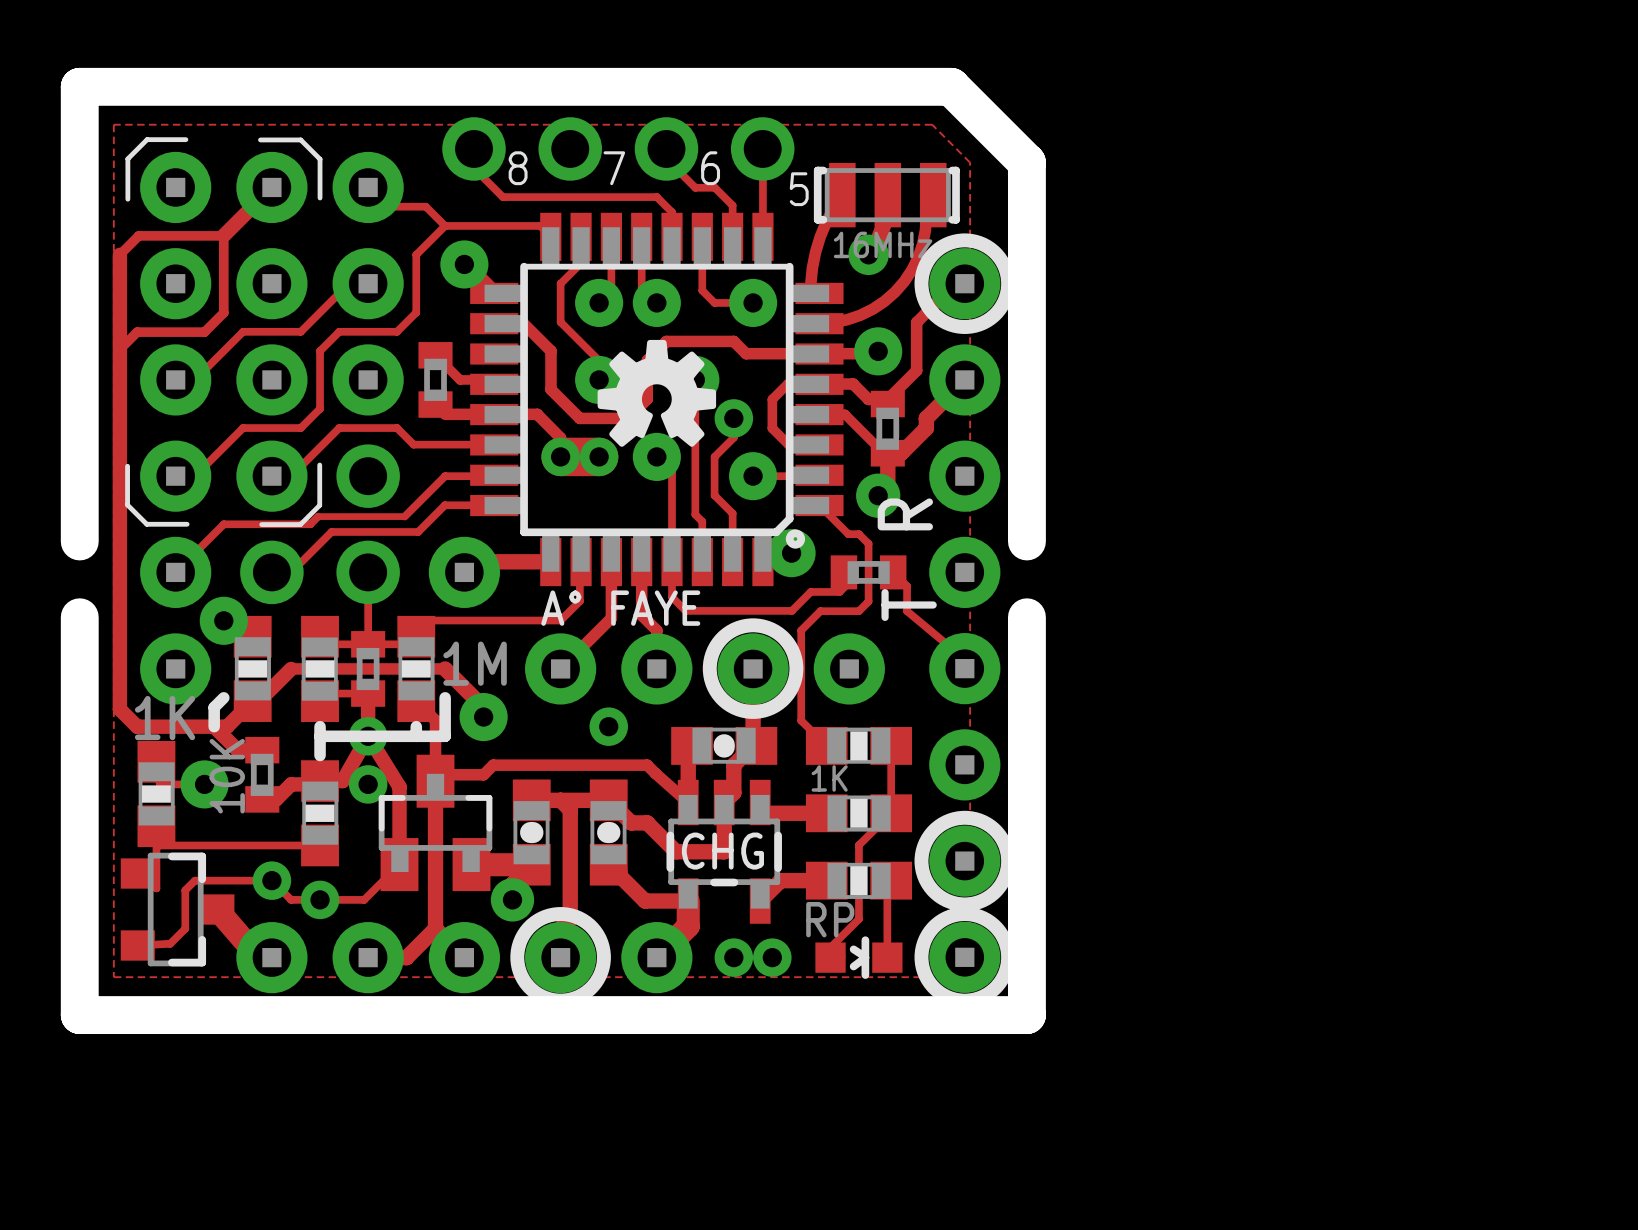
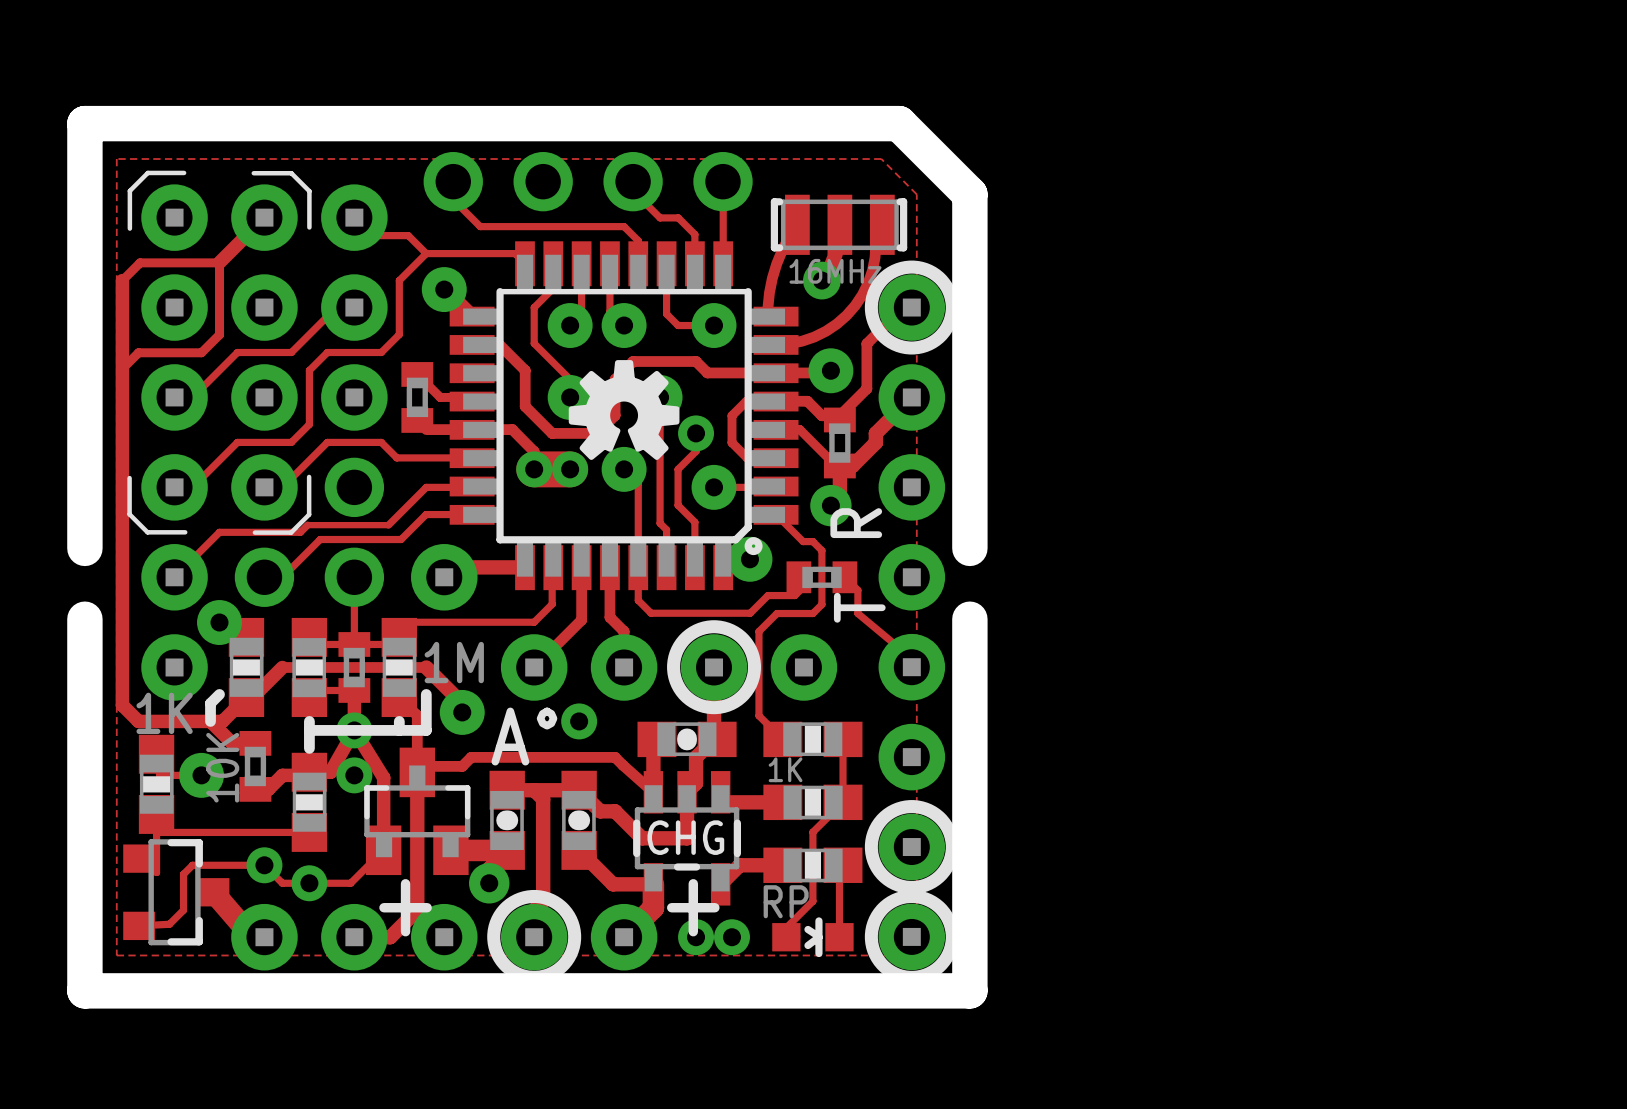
text: 8 (518, 168) -> none
text: 7 (614, 168) -> none
text: 6 (710, 168) -> none
text: 5 (799, 189) -> none
text: A° FAYE (620, 608) -> none
text: none -> A° (524, 736)
text: none -> + (405, 907)
text: none -> + (693, 907)

